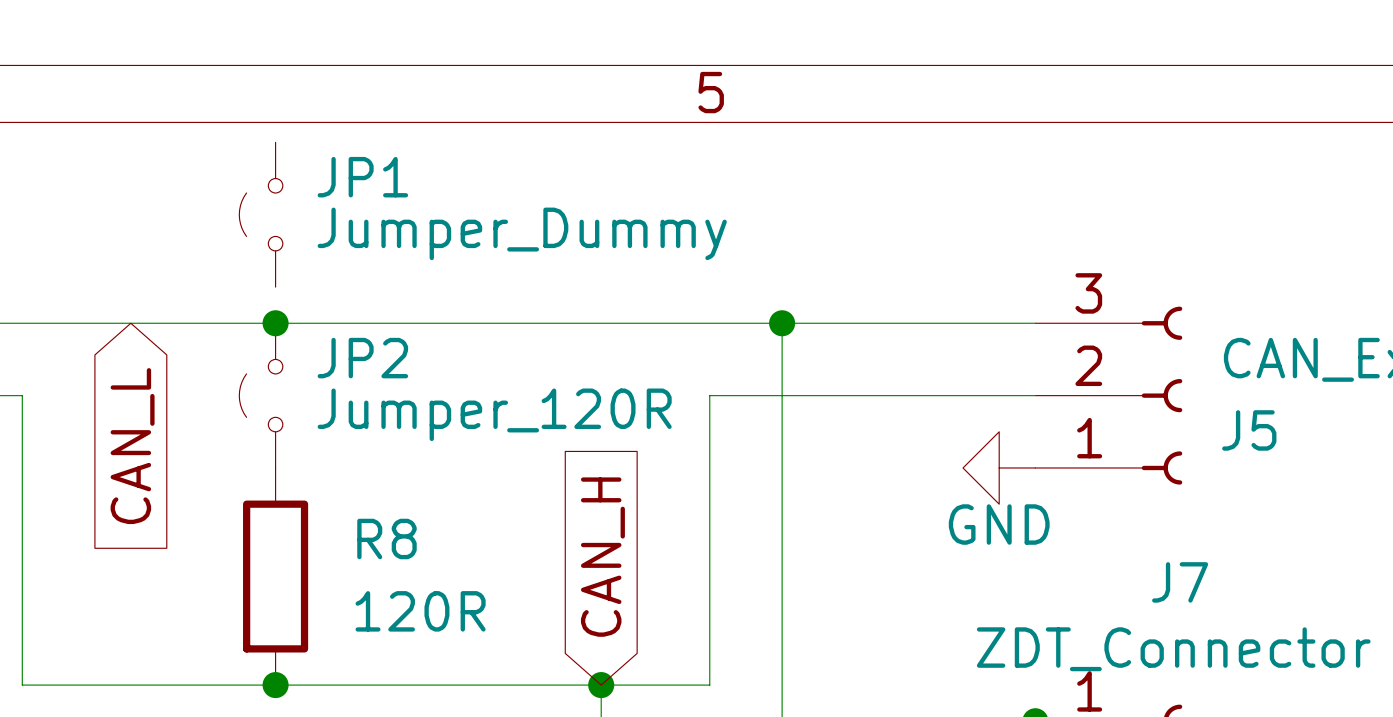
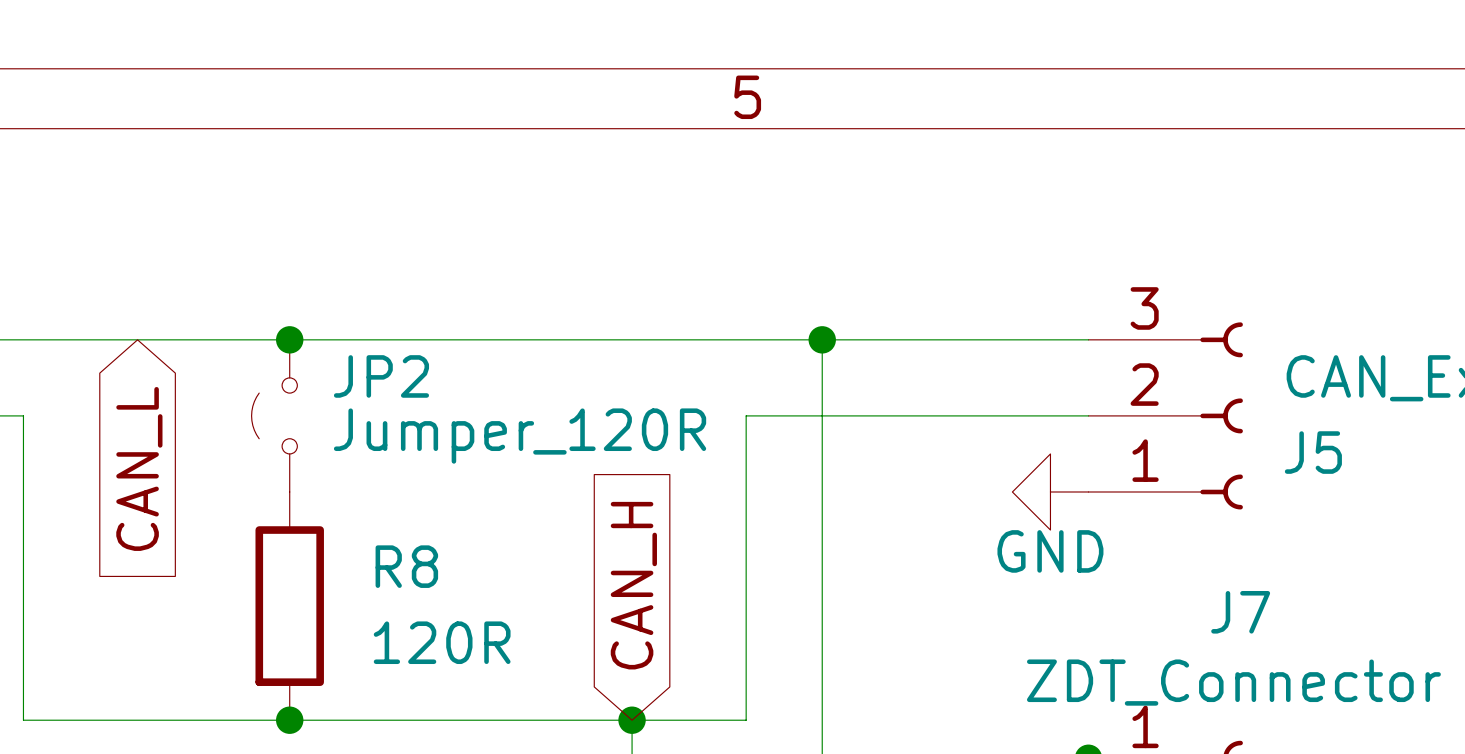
JP1: Jumper_Dummy (261, 214) -> none

